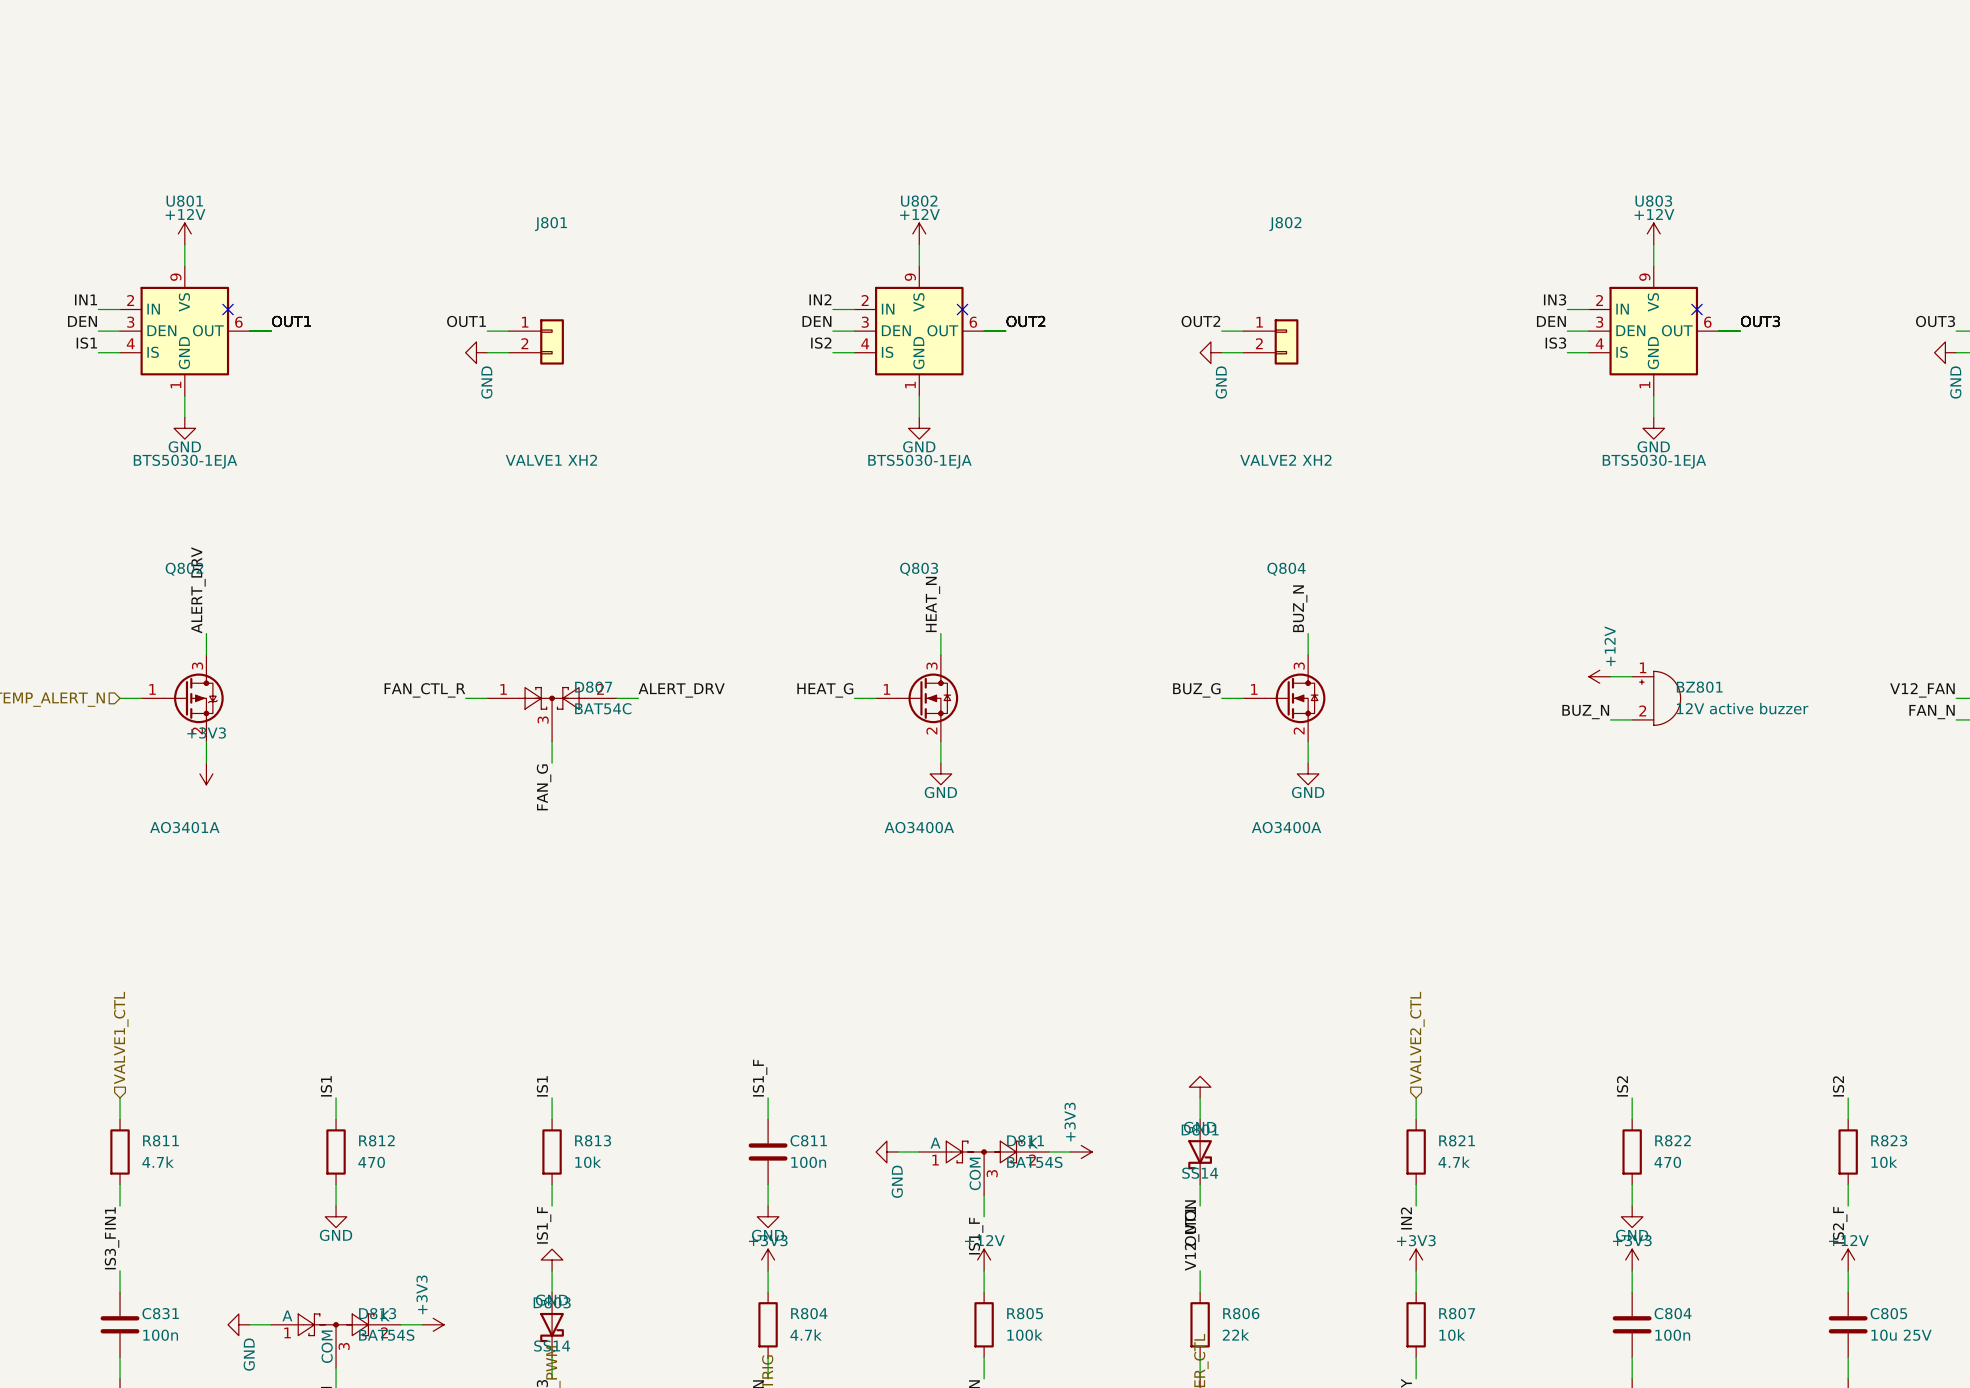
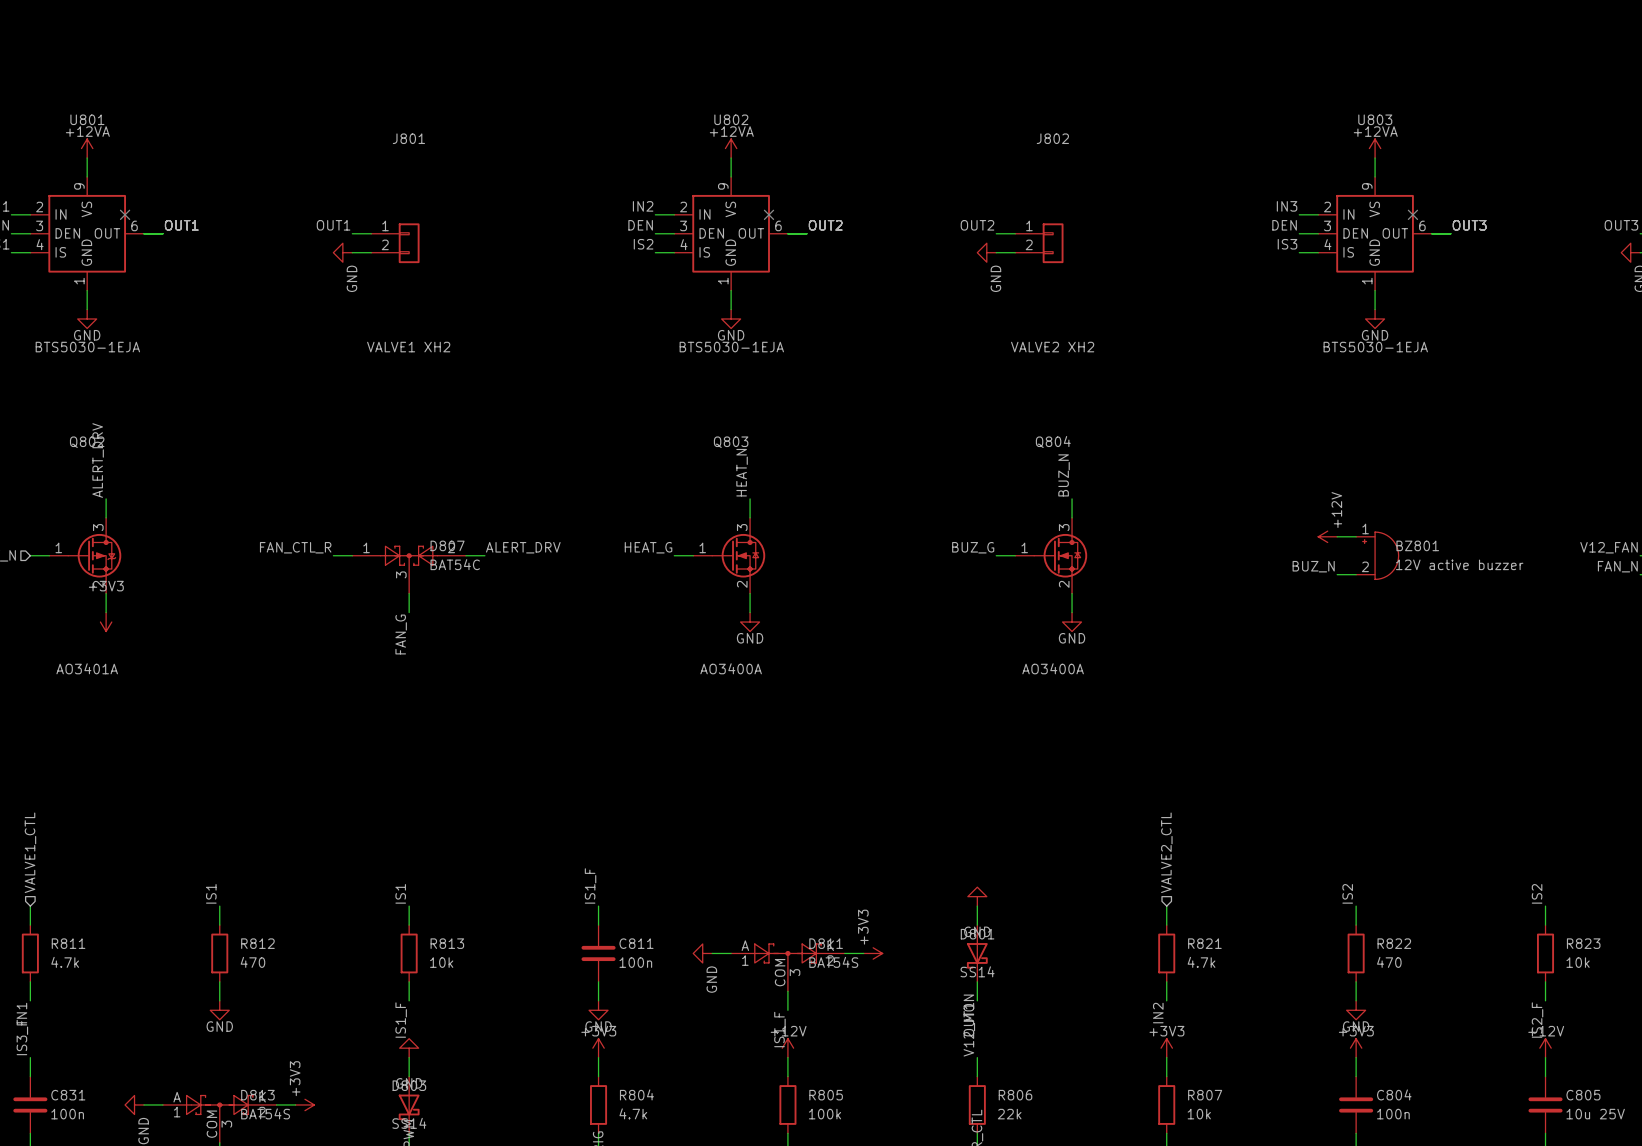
power symbol: +12V (184, 233) -> +12VA (87, 148)
power symbol: +12V (919, 233) -> +12VA (731, 148)
power symbol: +12V (1653, 233) -> +12VA (1375, 148)

